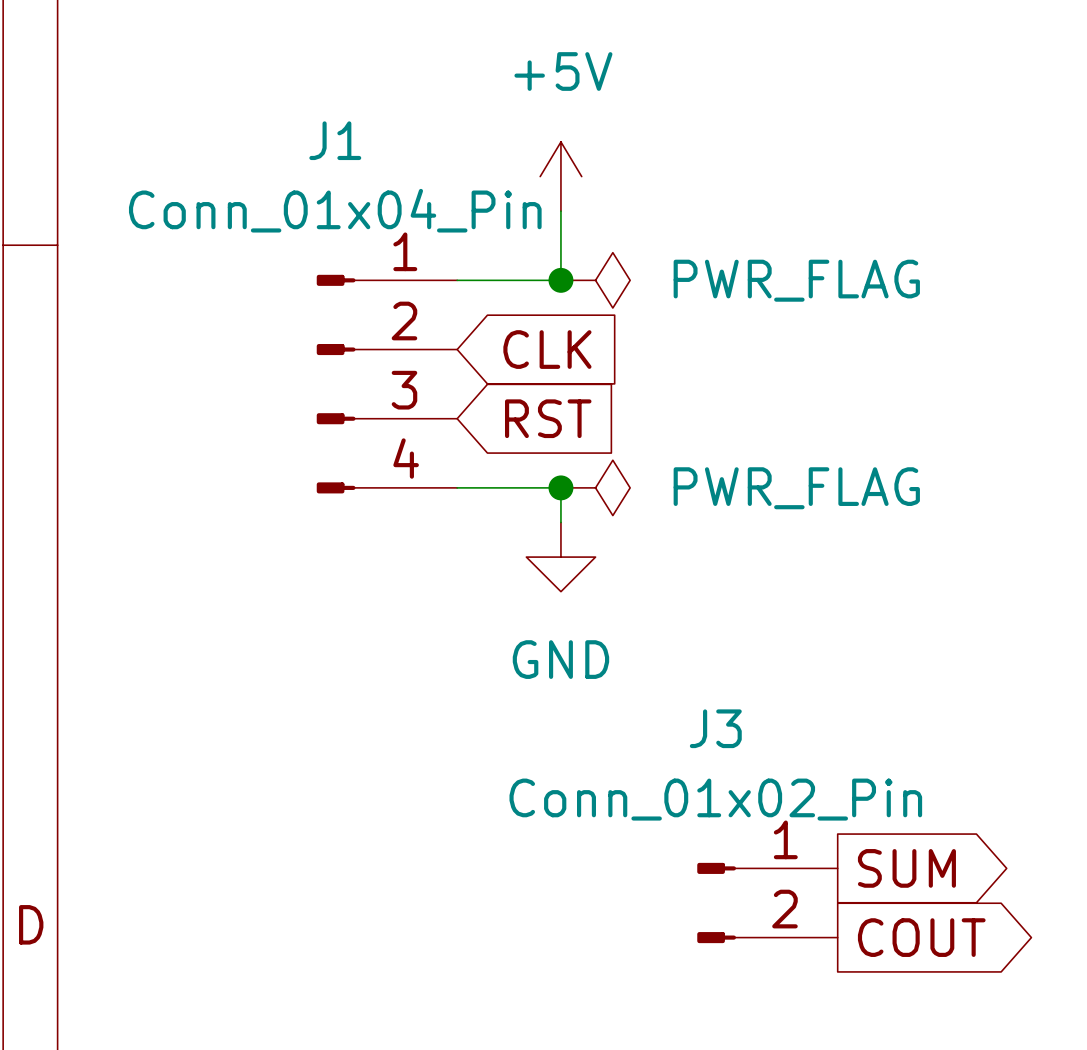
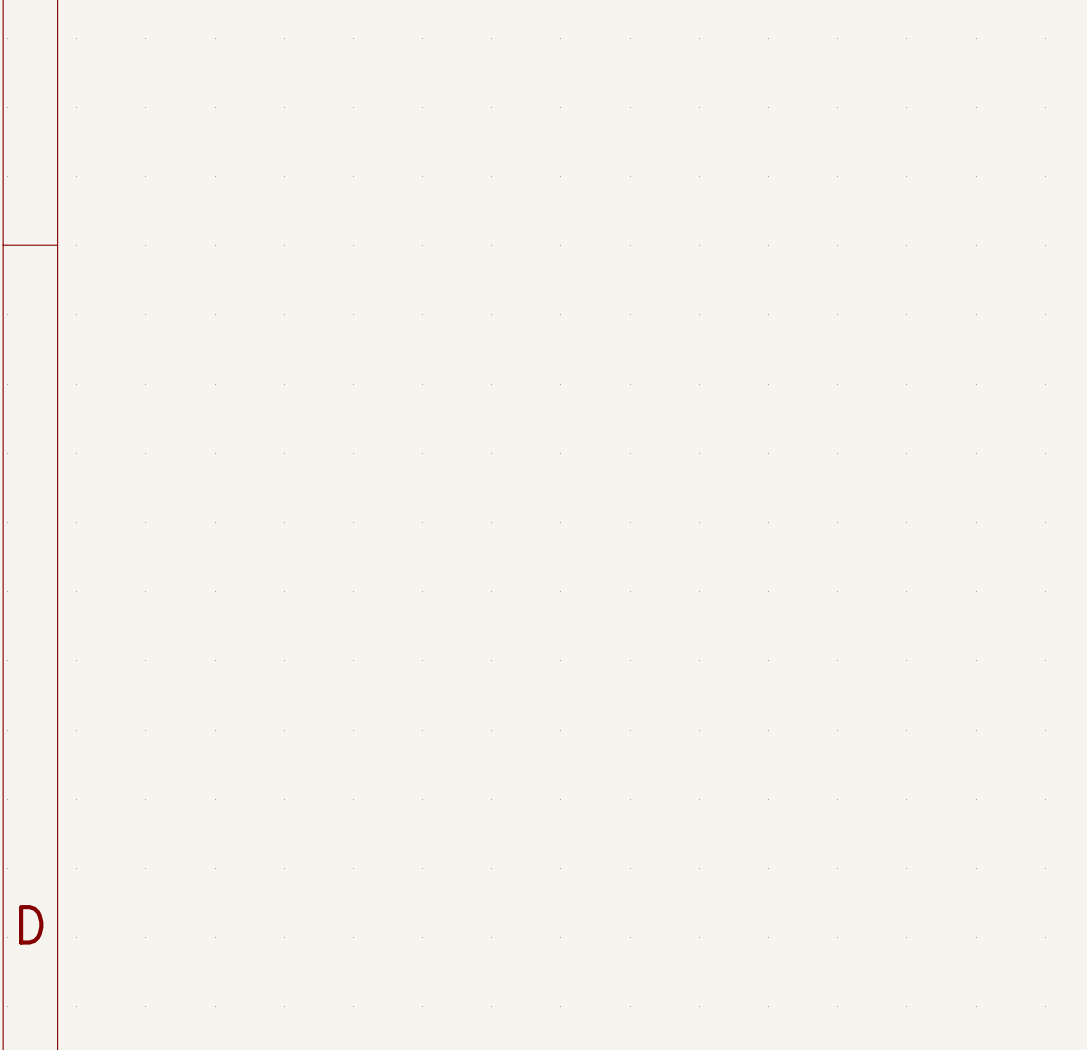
power symbol: +5V (560, 176) -> none
wire: (560, 211) (560, 280) (457, 280) -> none
junction: (560, 280) -> none
power symbol: PWR_FLAG (595, 280) -> none
global label: CLK (547, 349) -> none
J1: Conn_01x04_Pin (386, 384) -> none
global label: RST (548, 418) -> none
wire: (457, 487) (560, 487) (560, 522) -> none
junction: (560, 487) -> none
power symbol: PWR_FLAG (595, 487) -> none
power symbol: GND (560, 557) -> none
global label: SUM (906, 868) -> none
J3: Conn_01x02_Pin (767, 903) -> none
global label: COUT (921, 937) -> none

